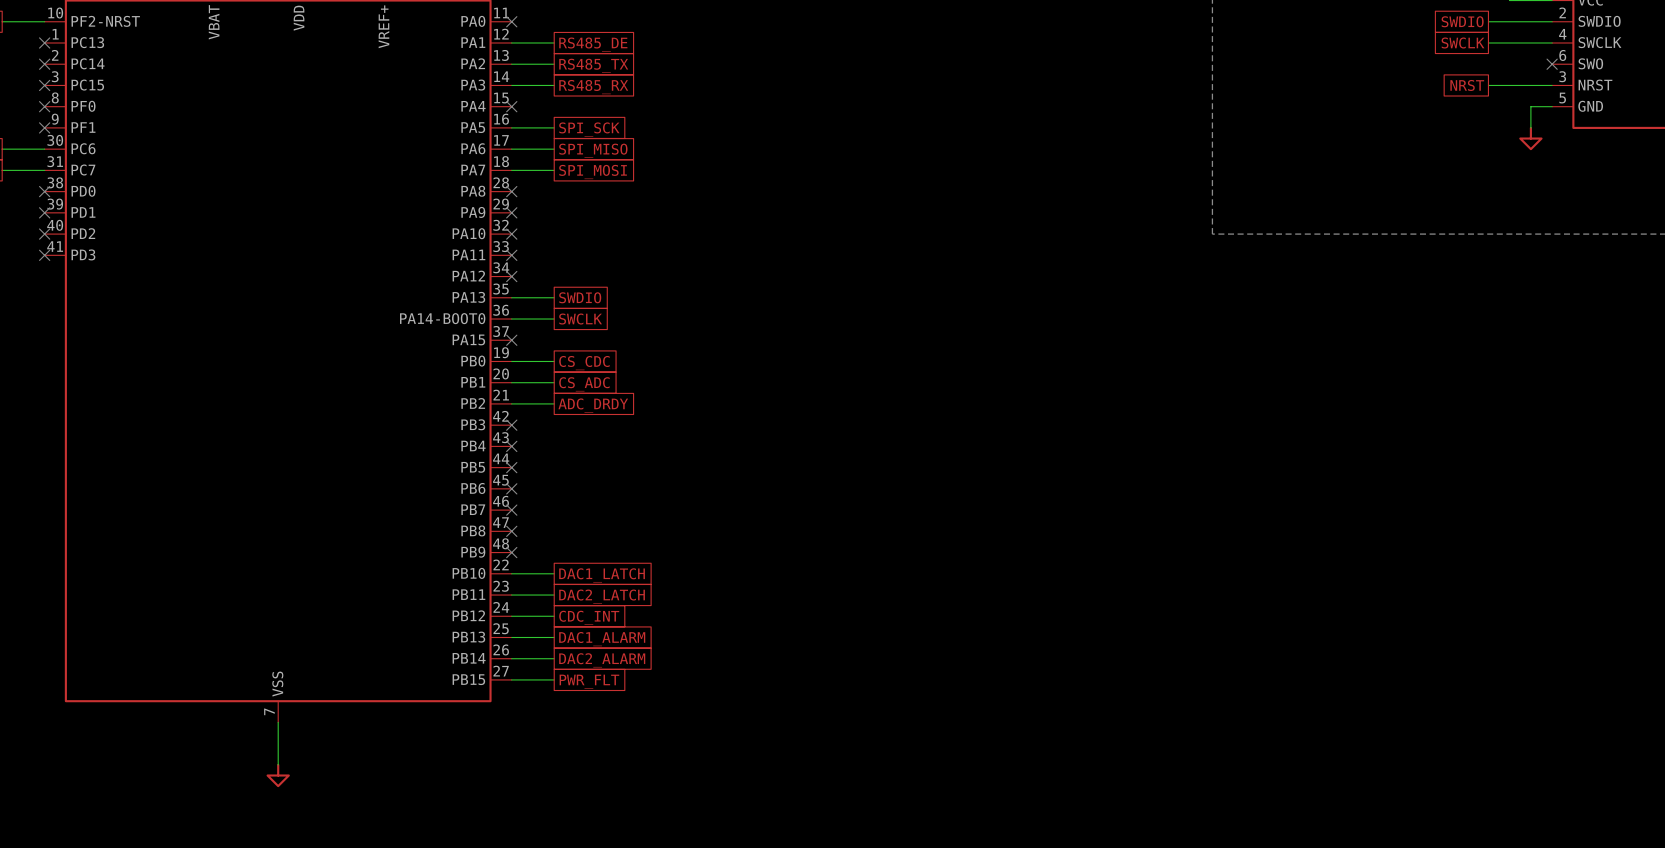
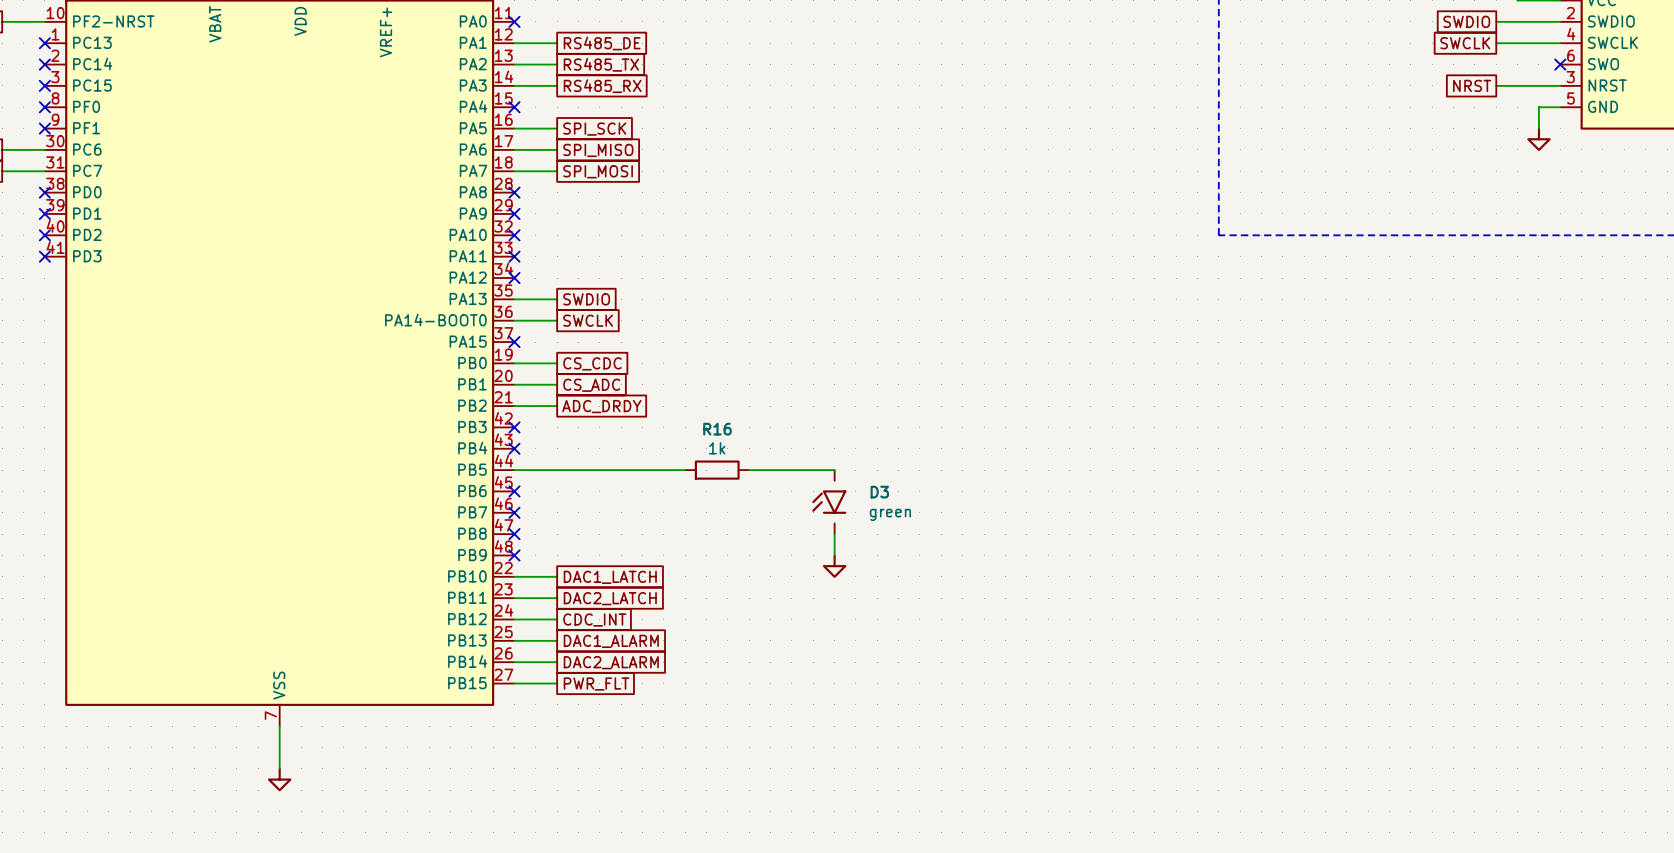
wire: none -> (514, 470) (685, 470)
no-connect mark: (511, 467) -> none
R16: none -> 1k (717, 470)
wire: none -> (749, 470) (834, 470)
D3: none -> green (829, 502)
wire: none -> (834, 534) (834, 555)
power symbol: none -> (834, 566)

